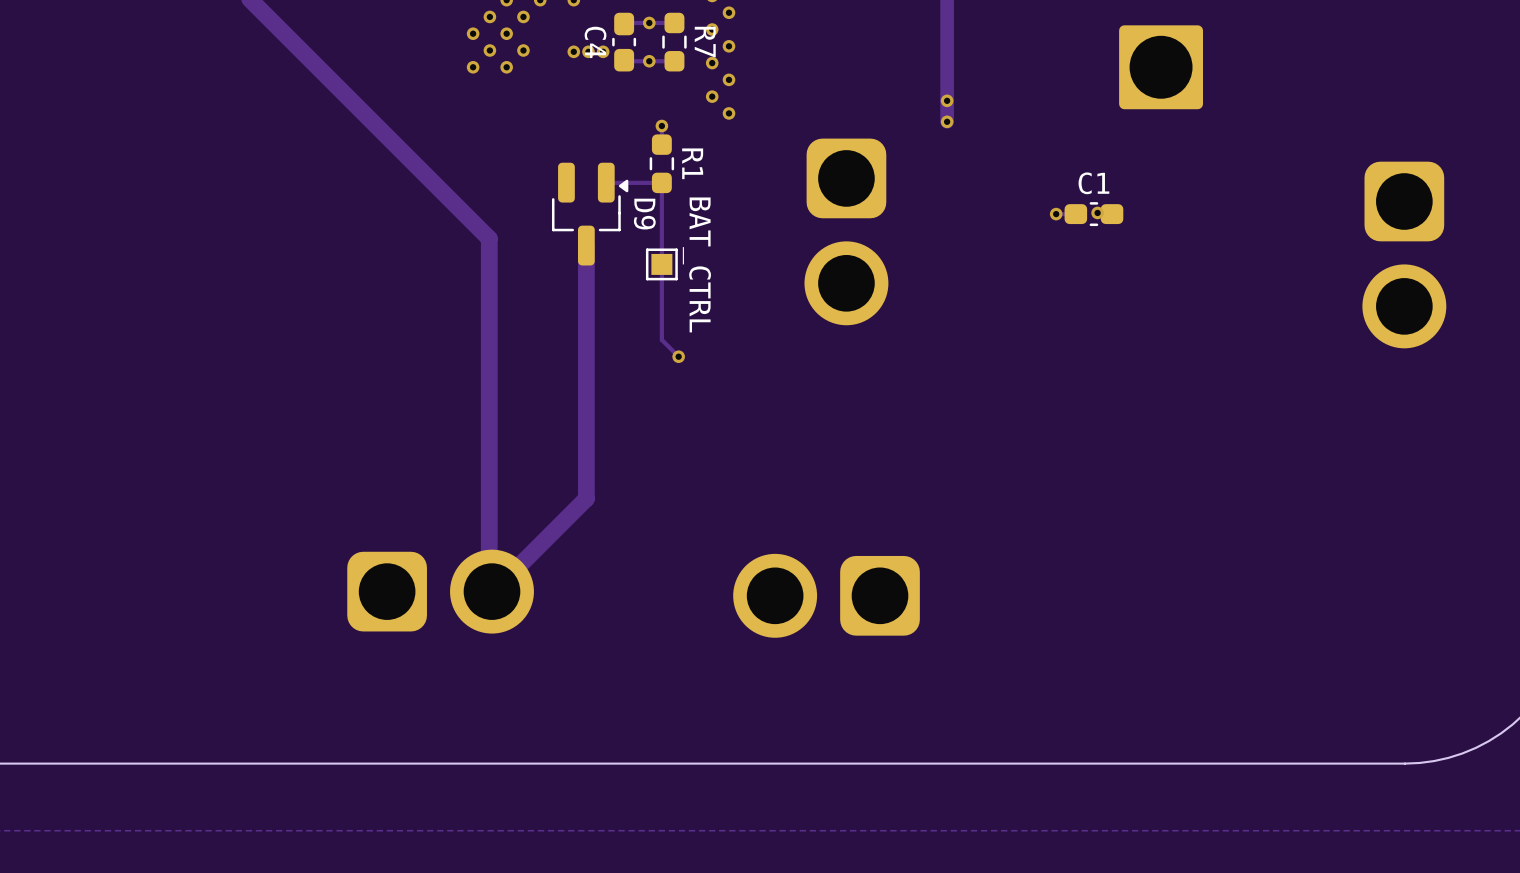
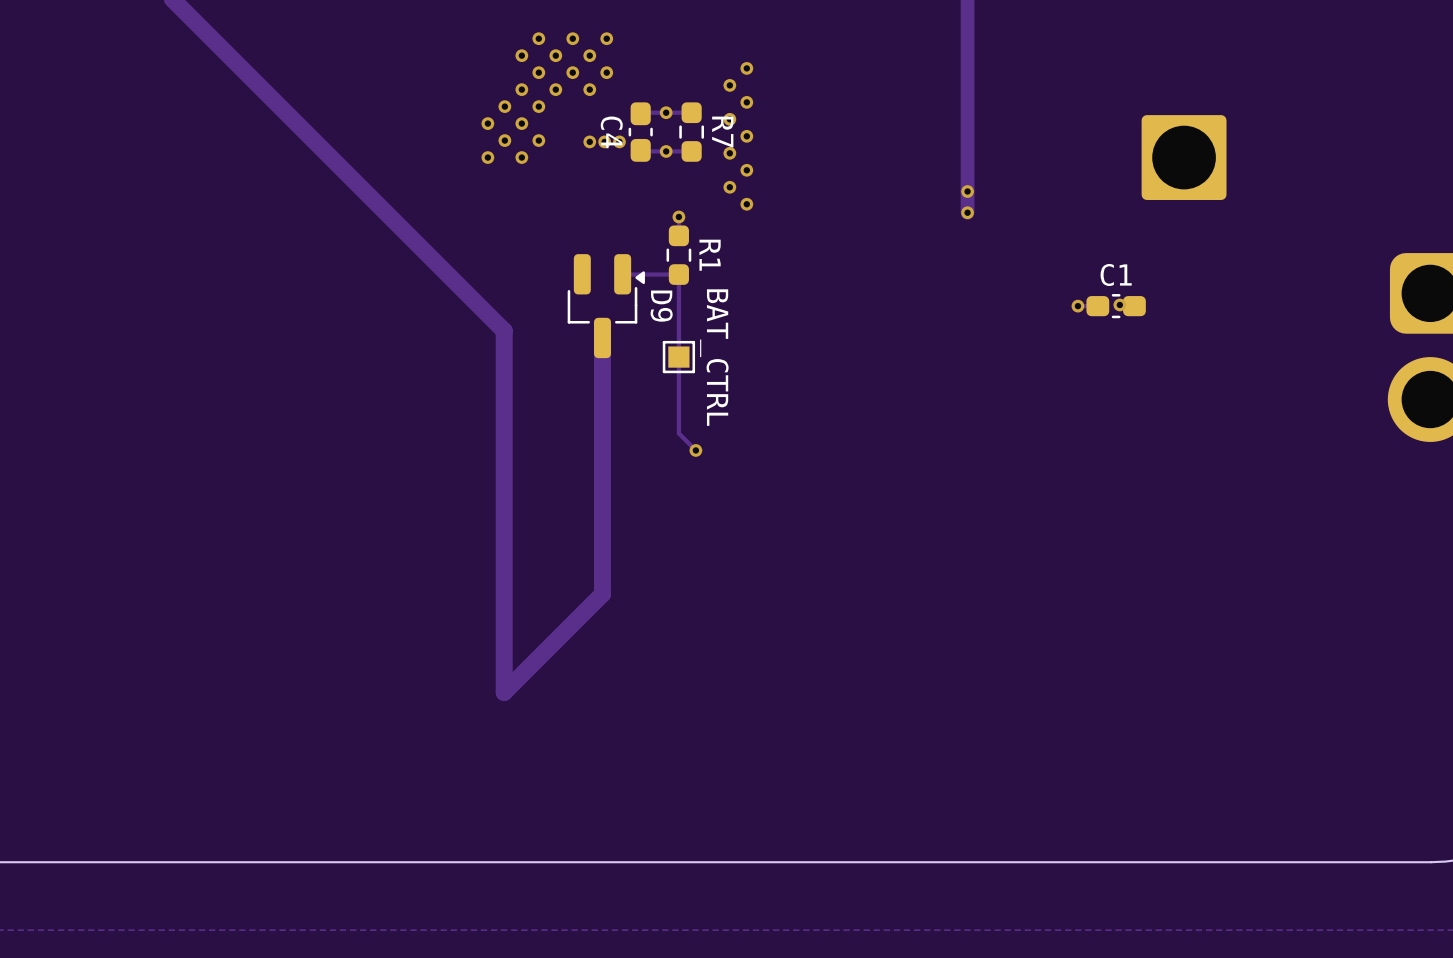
part: (846, 231) -> none
part: (440, 591) -> none
part: (826, 595) -> none

